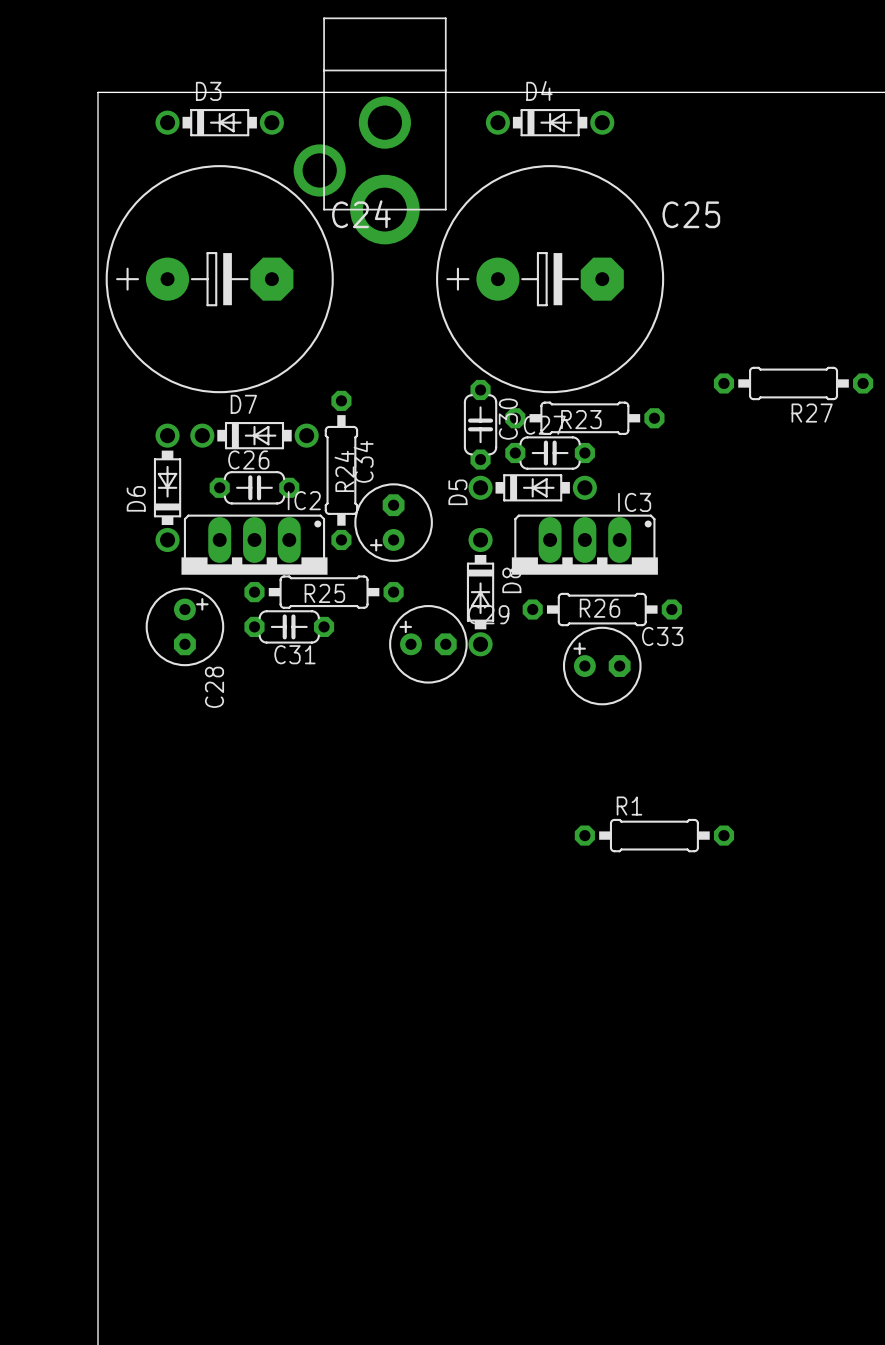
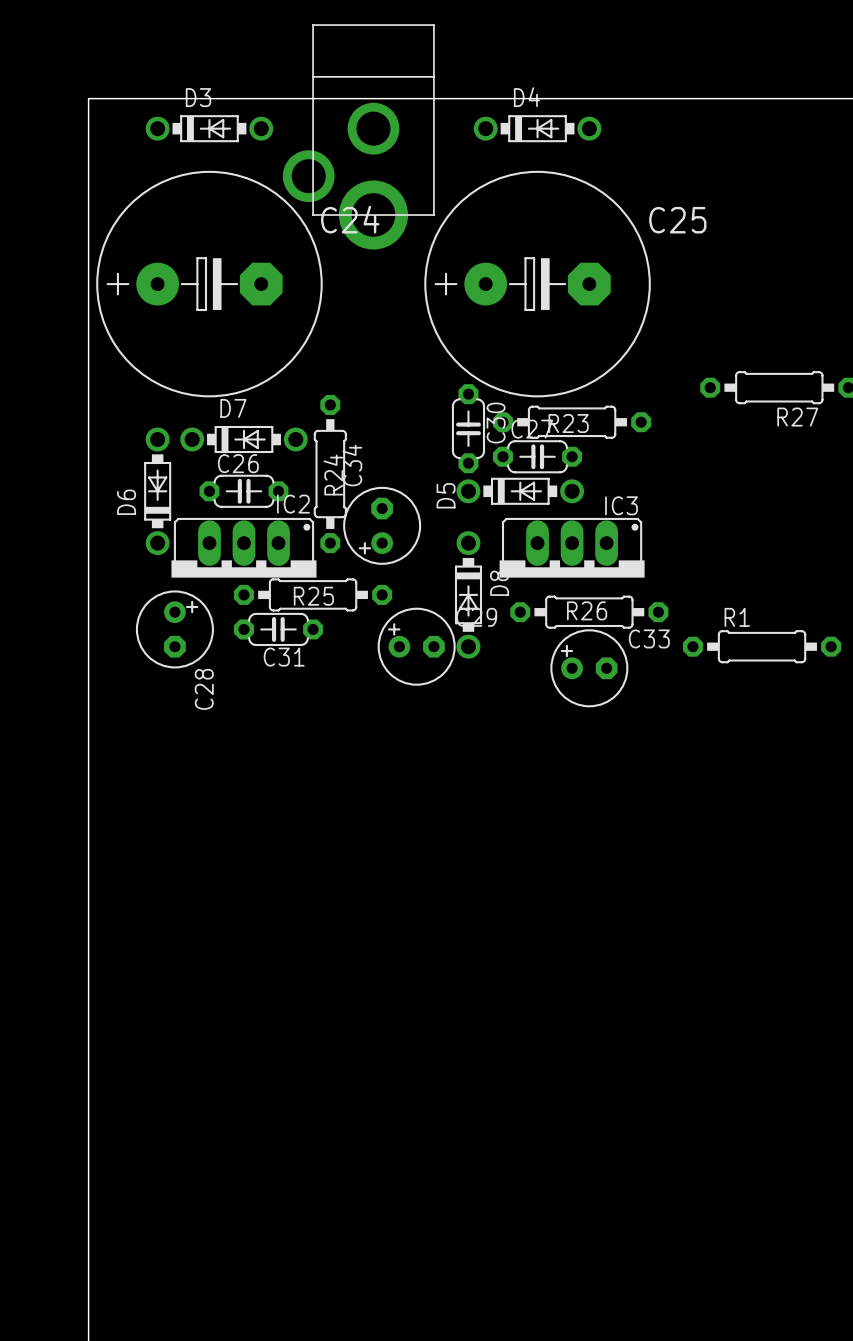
R1 position: (654, 835) -> (762, 646)

